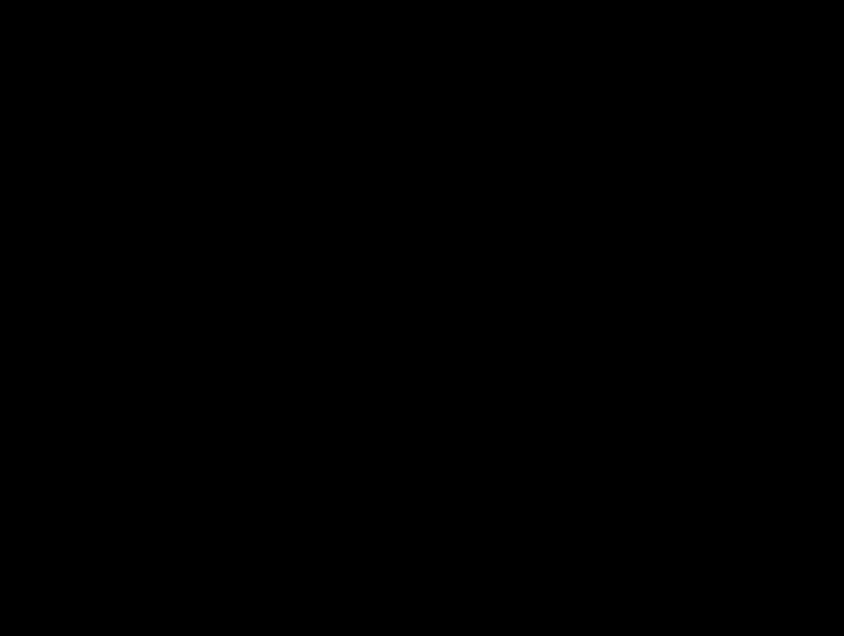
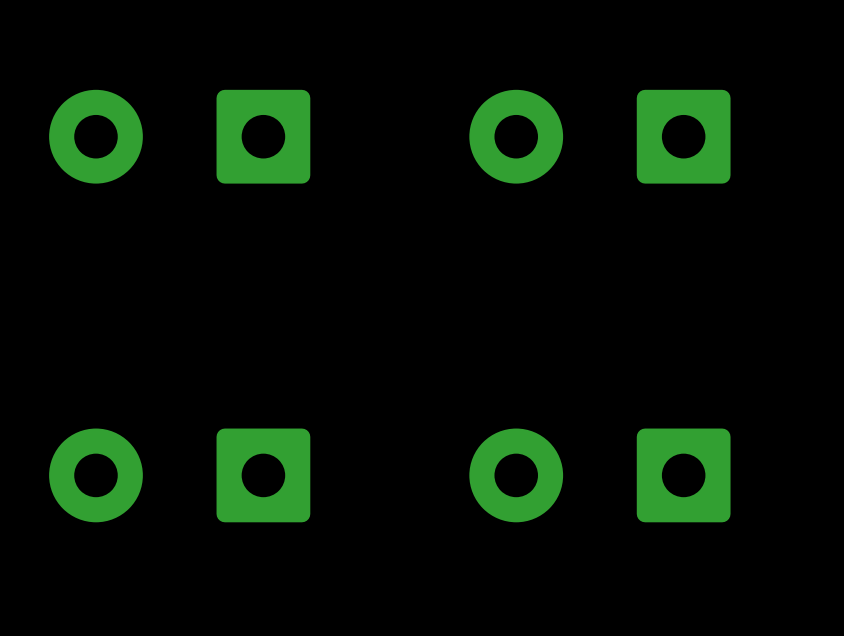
part: none -> (179, 136)
part: none -> (599, 136)
part: none -> (179, 475)
part: none -> (599, 475)

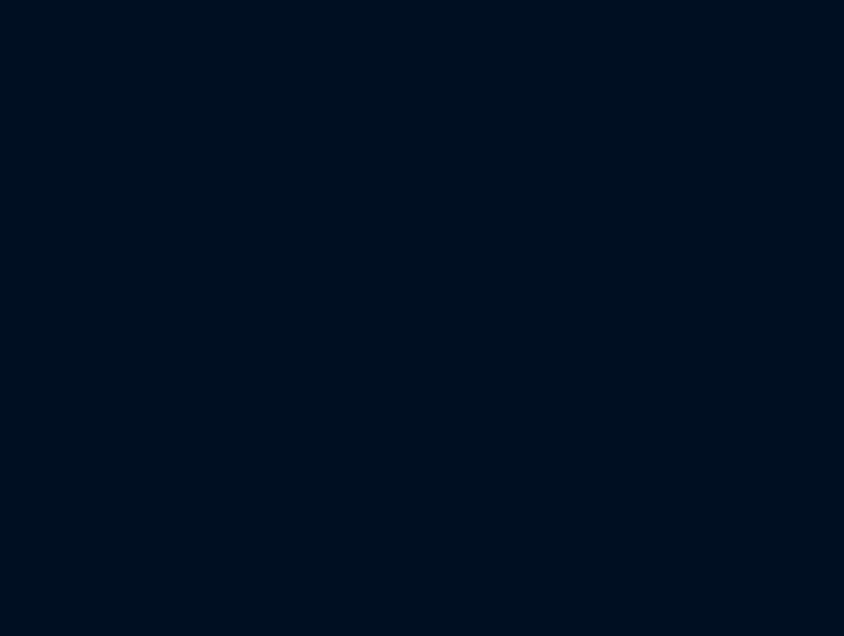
part: (179, 136) -> none
part: (599, 136) -> none
part: (179, 475) -> none
part: (599, 475) -> none

